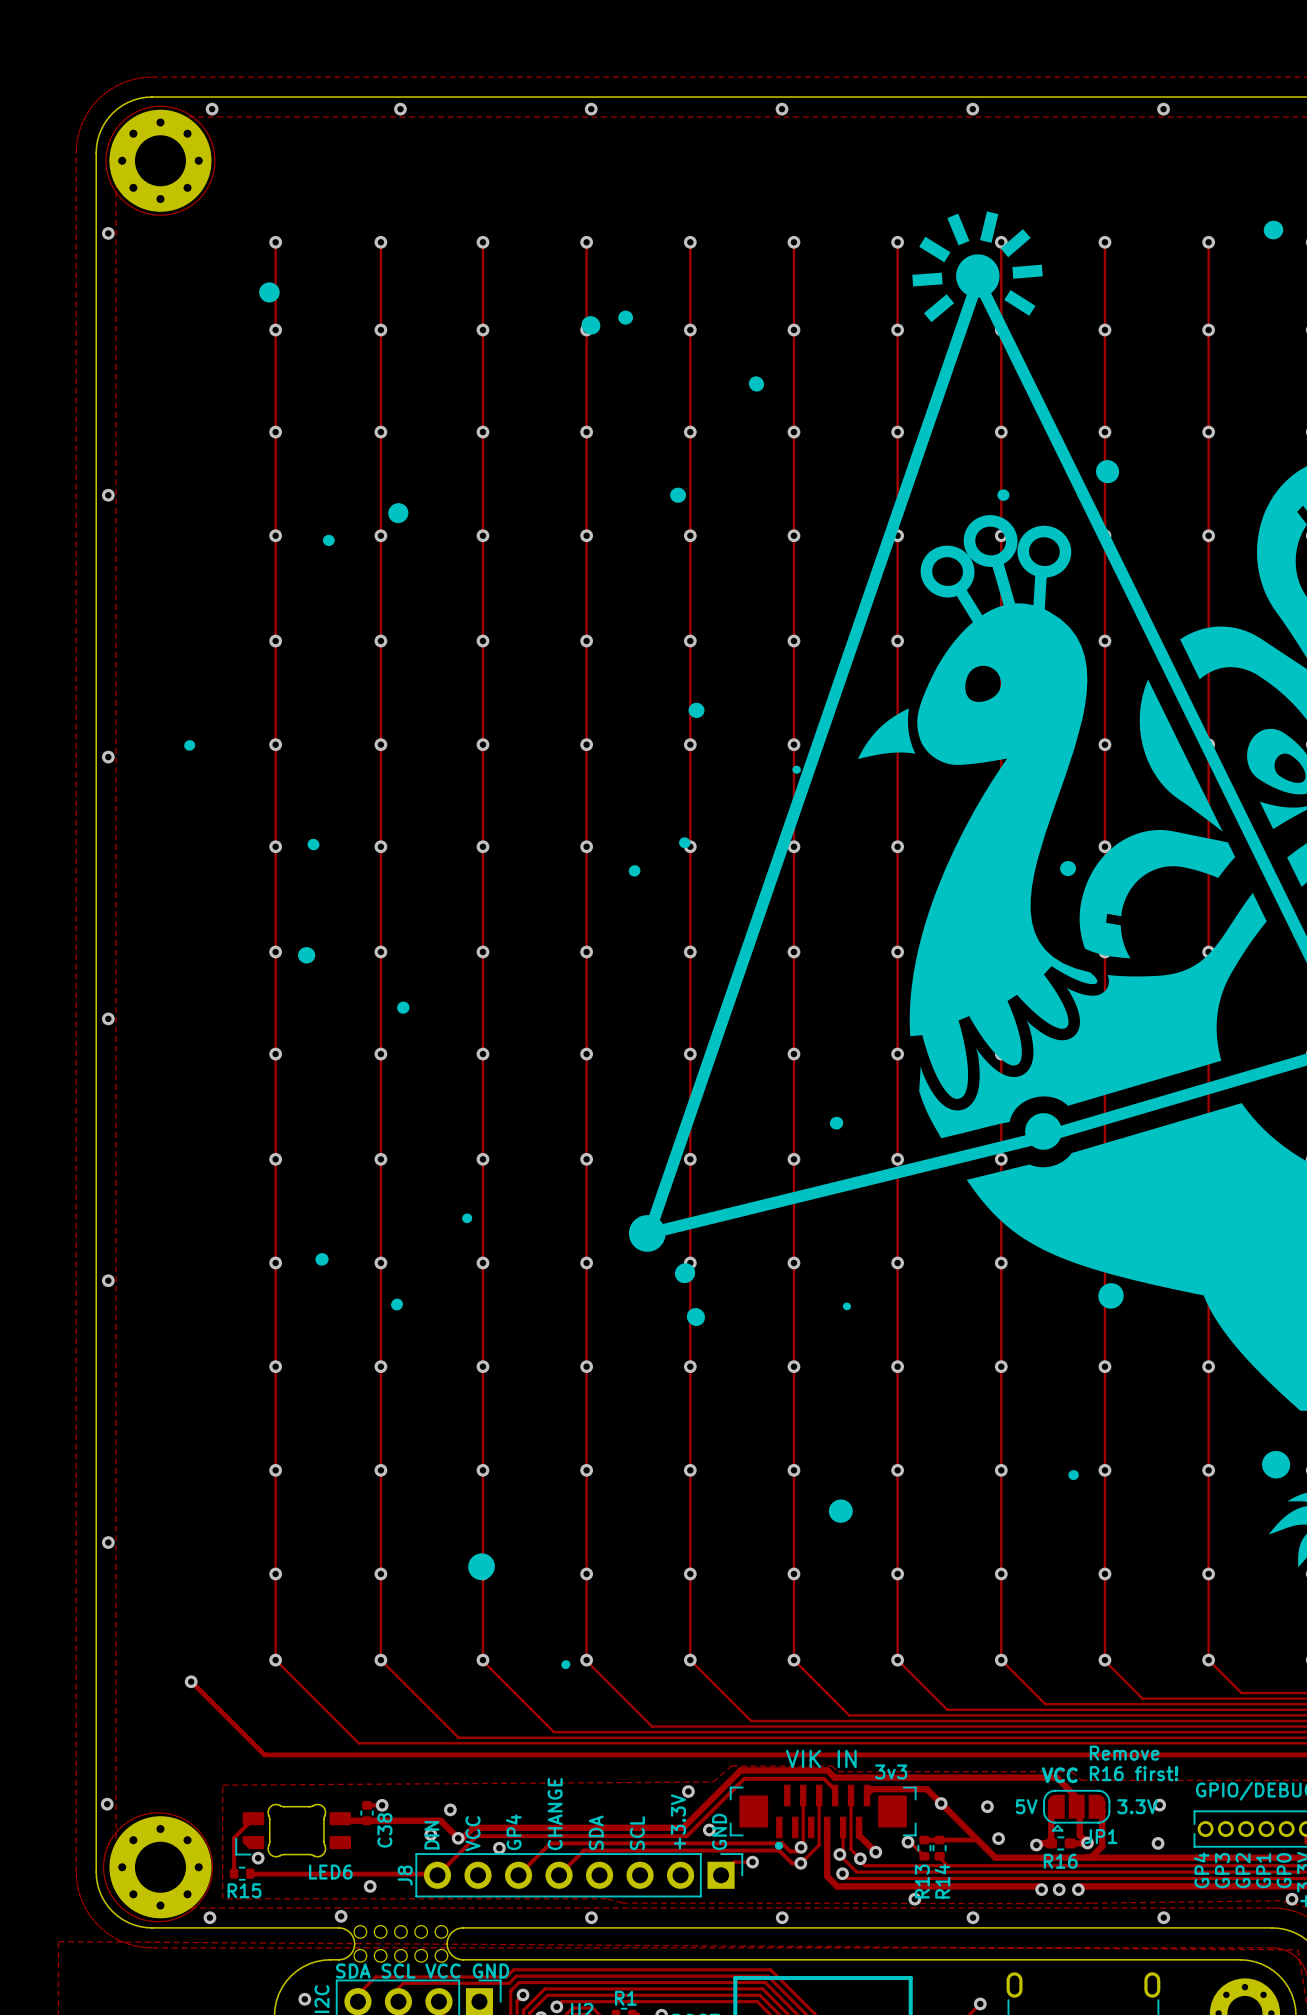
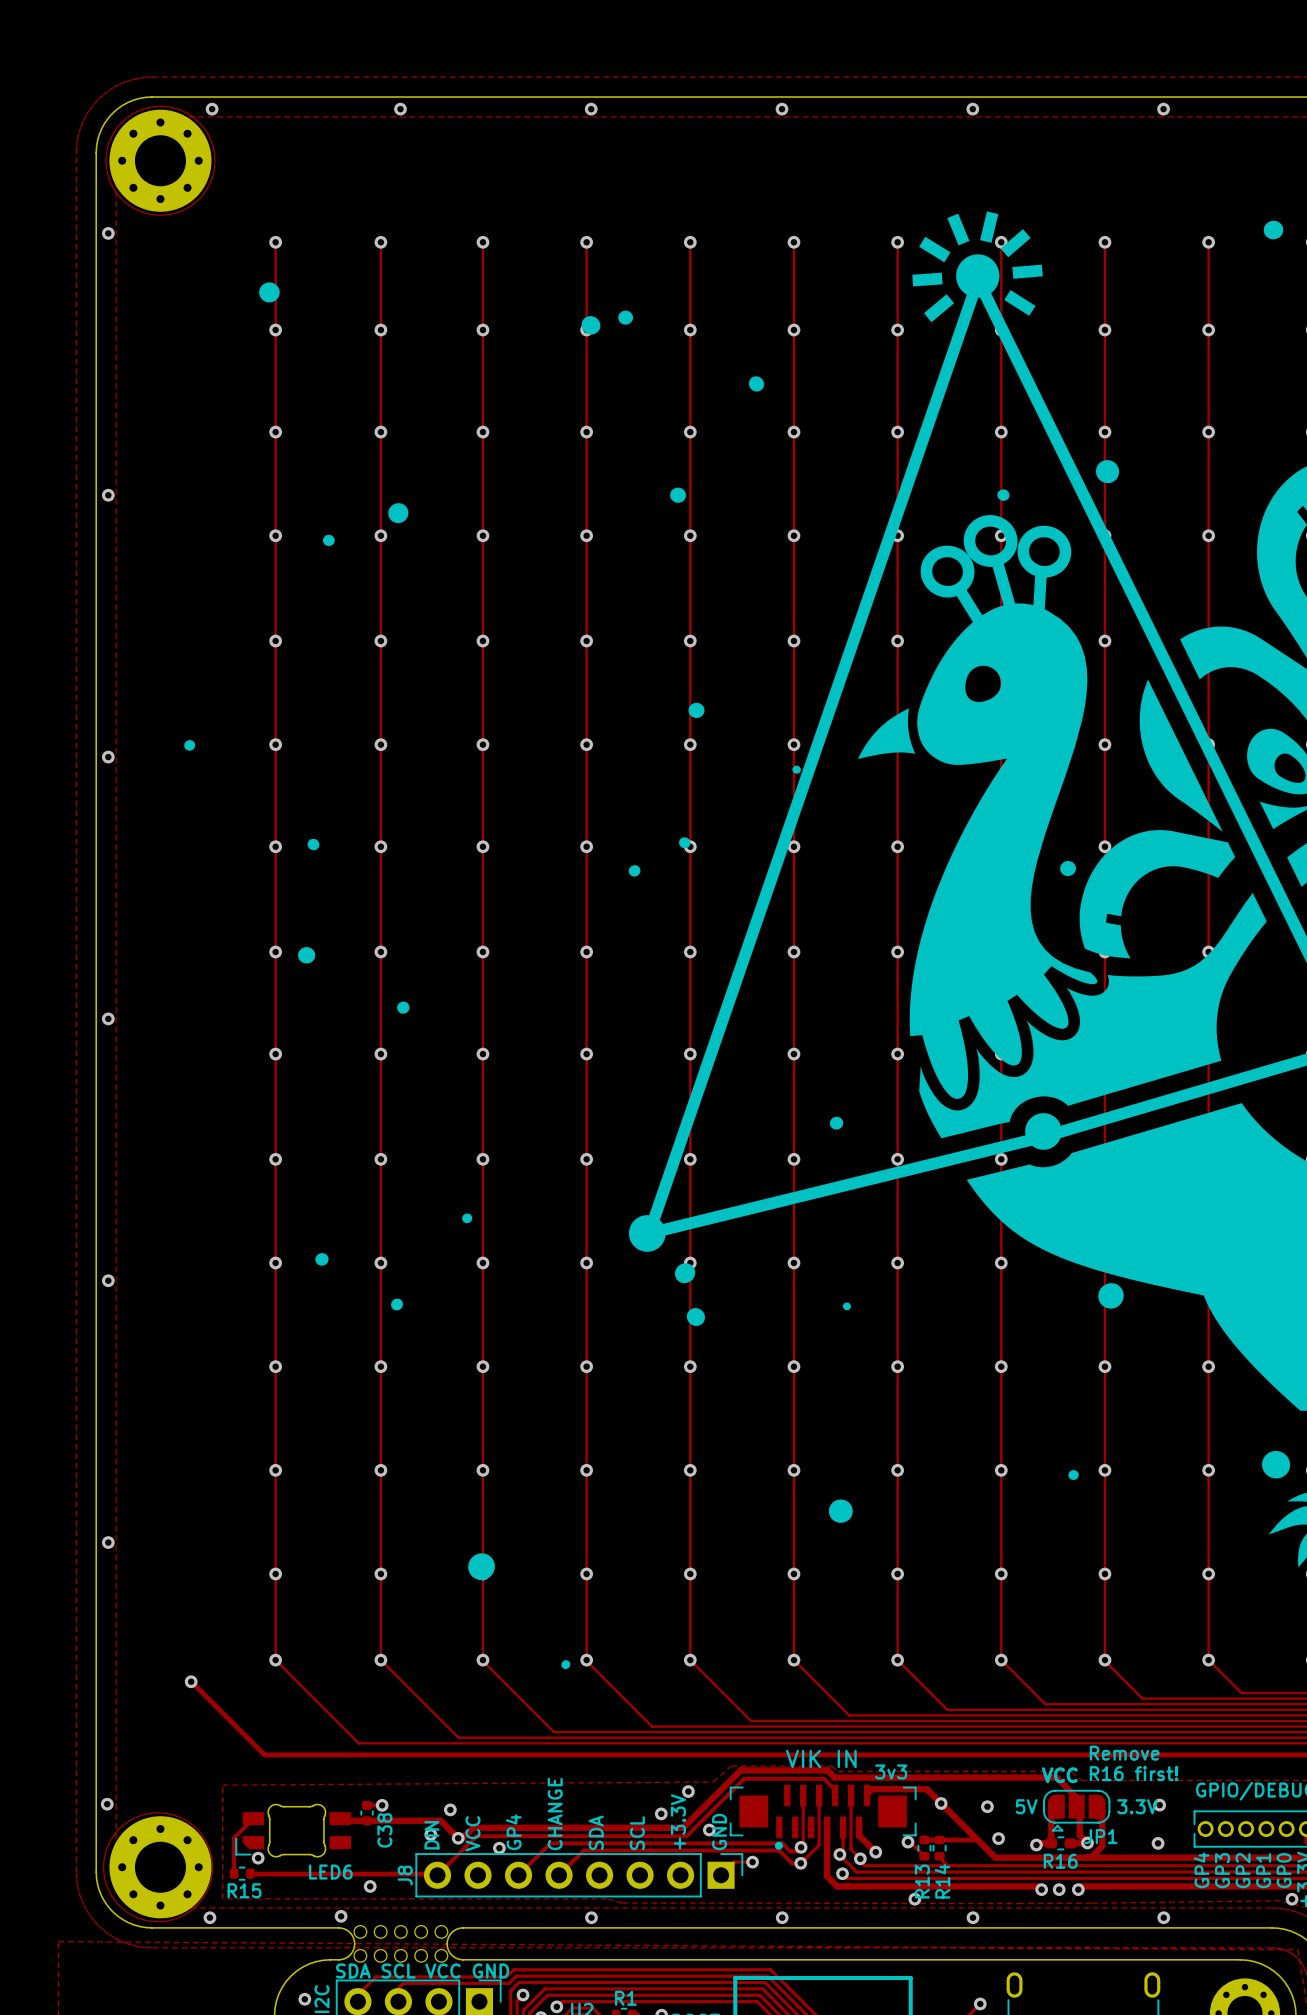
via: none -> (661, 1813)

